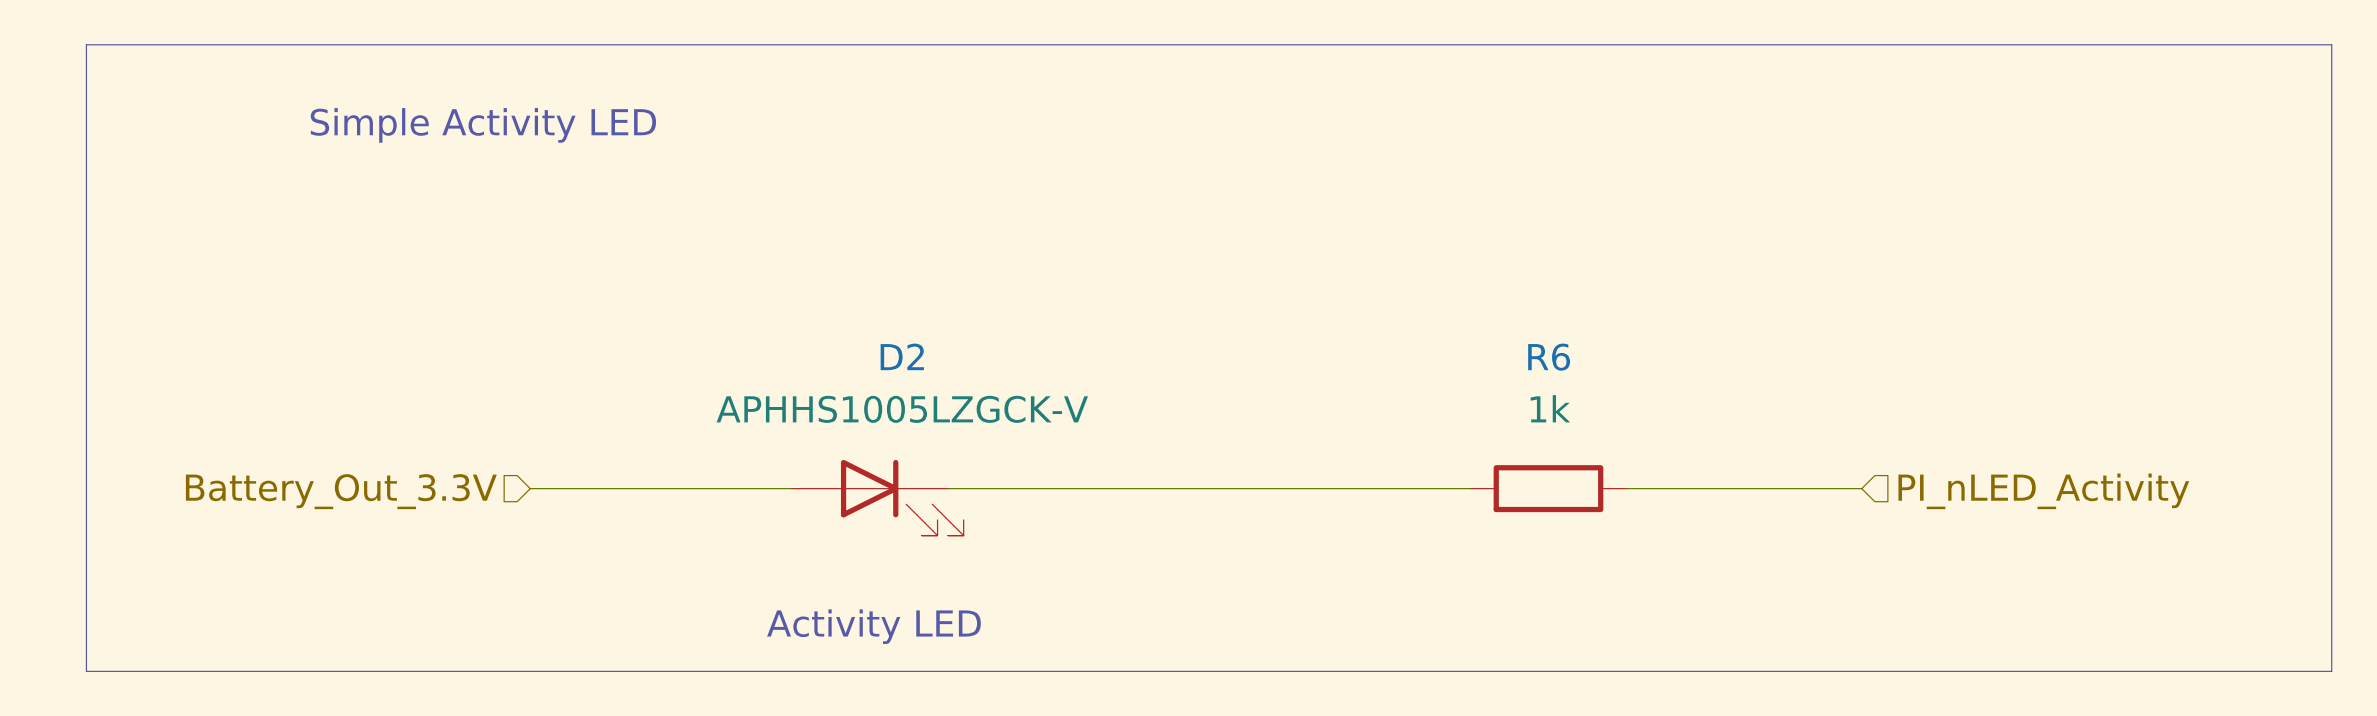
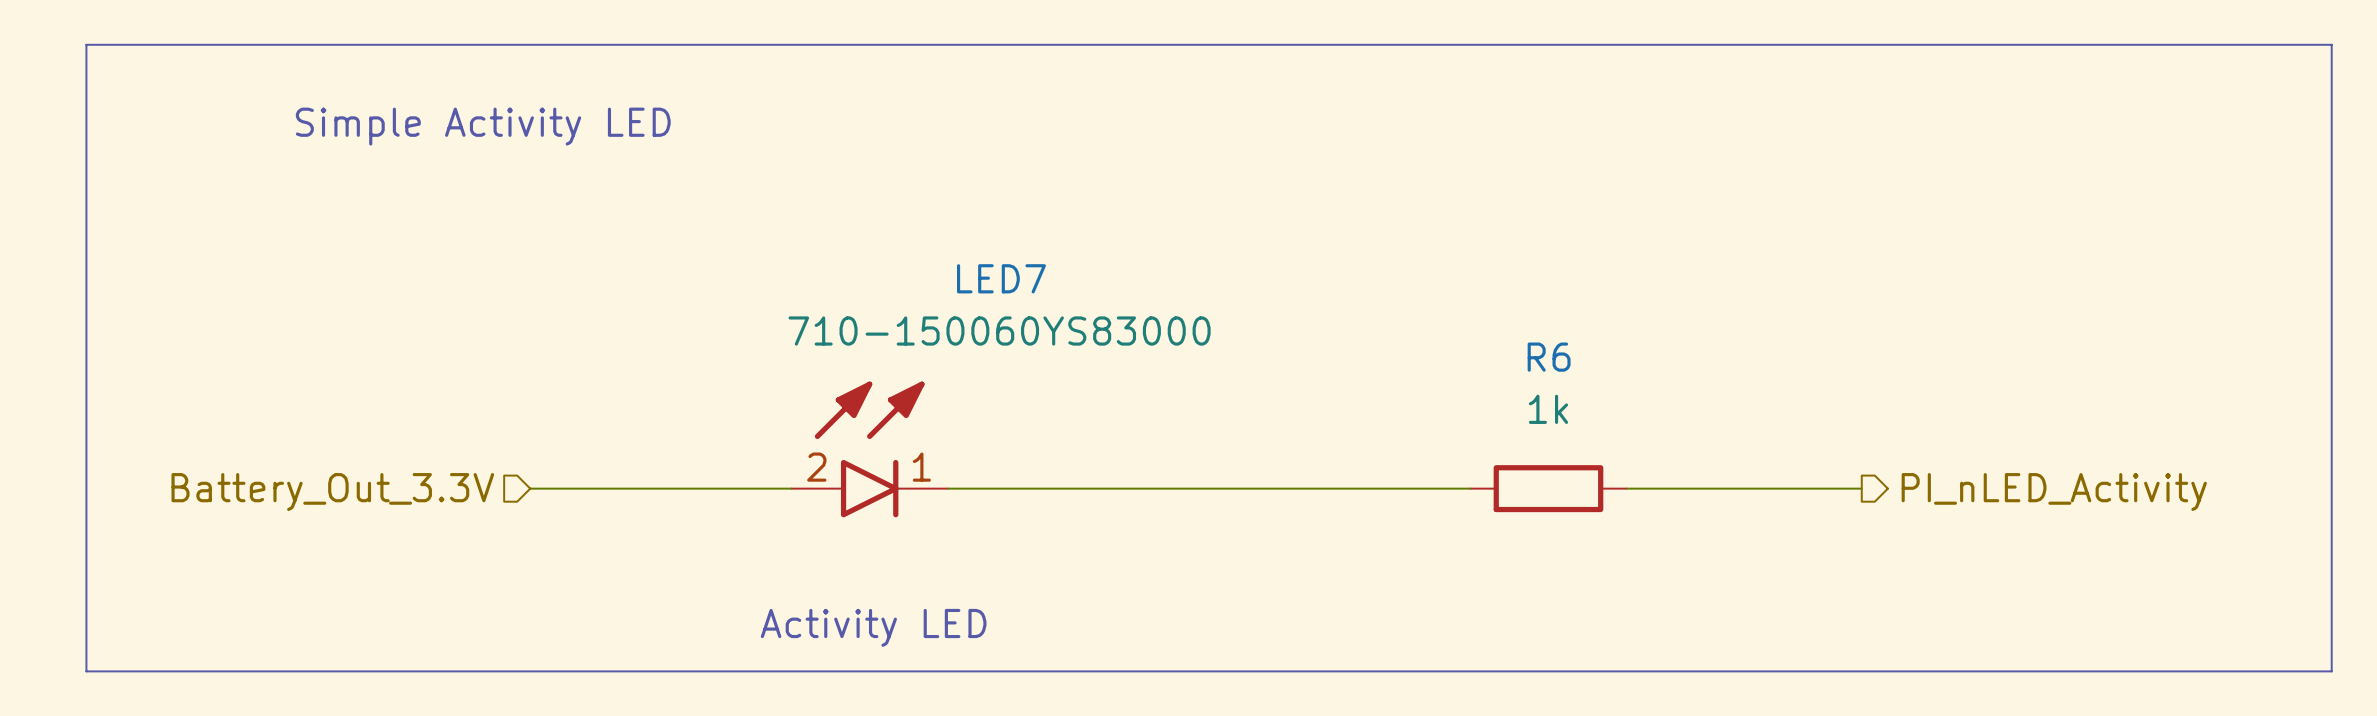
LED7: none -> 710-150060YS83000 (869, 449)
hierarchical label shape: input (2043, 491) -> output (2054, 492)
D2: APHHS1005LZGCK-V (877, 497) -> none

